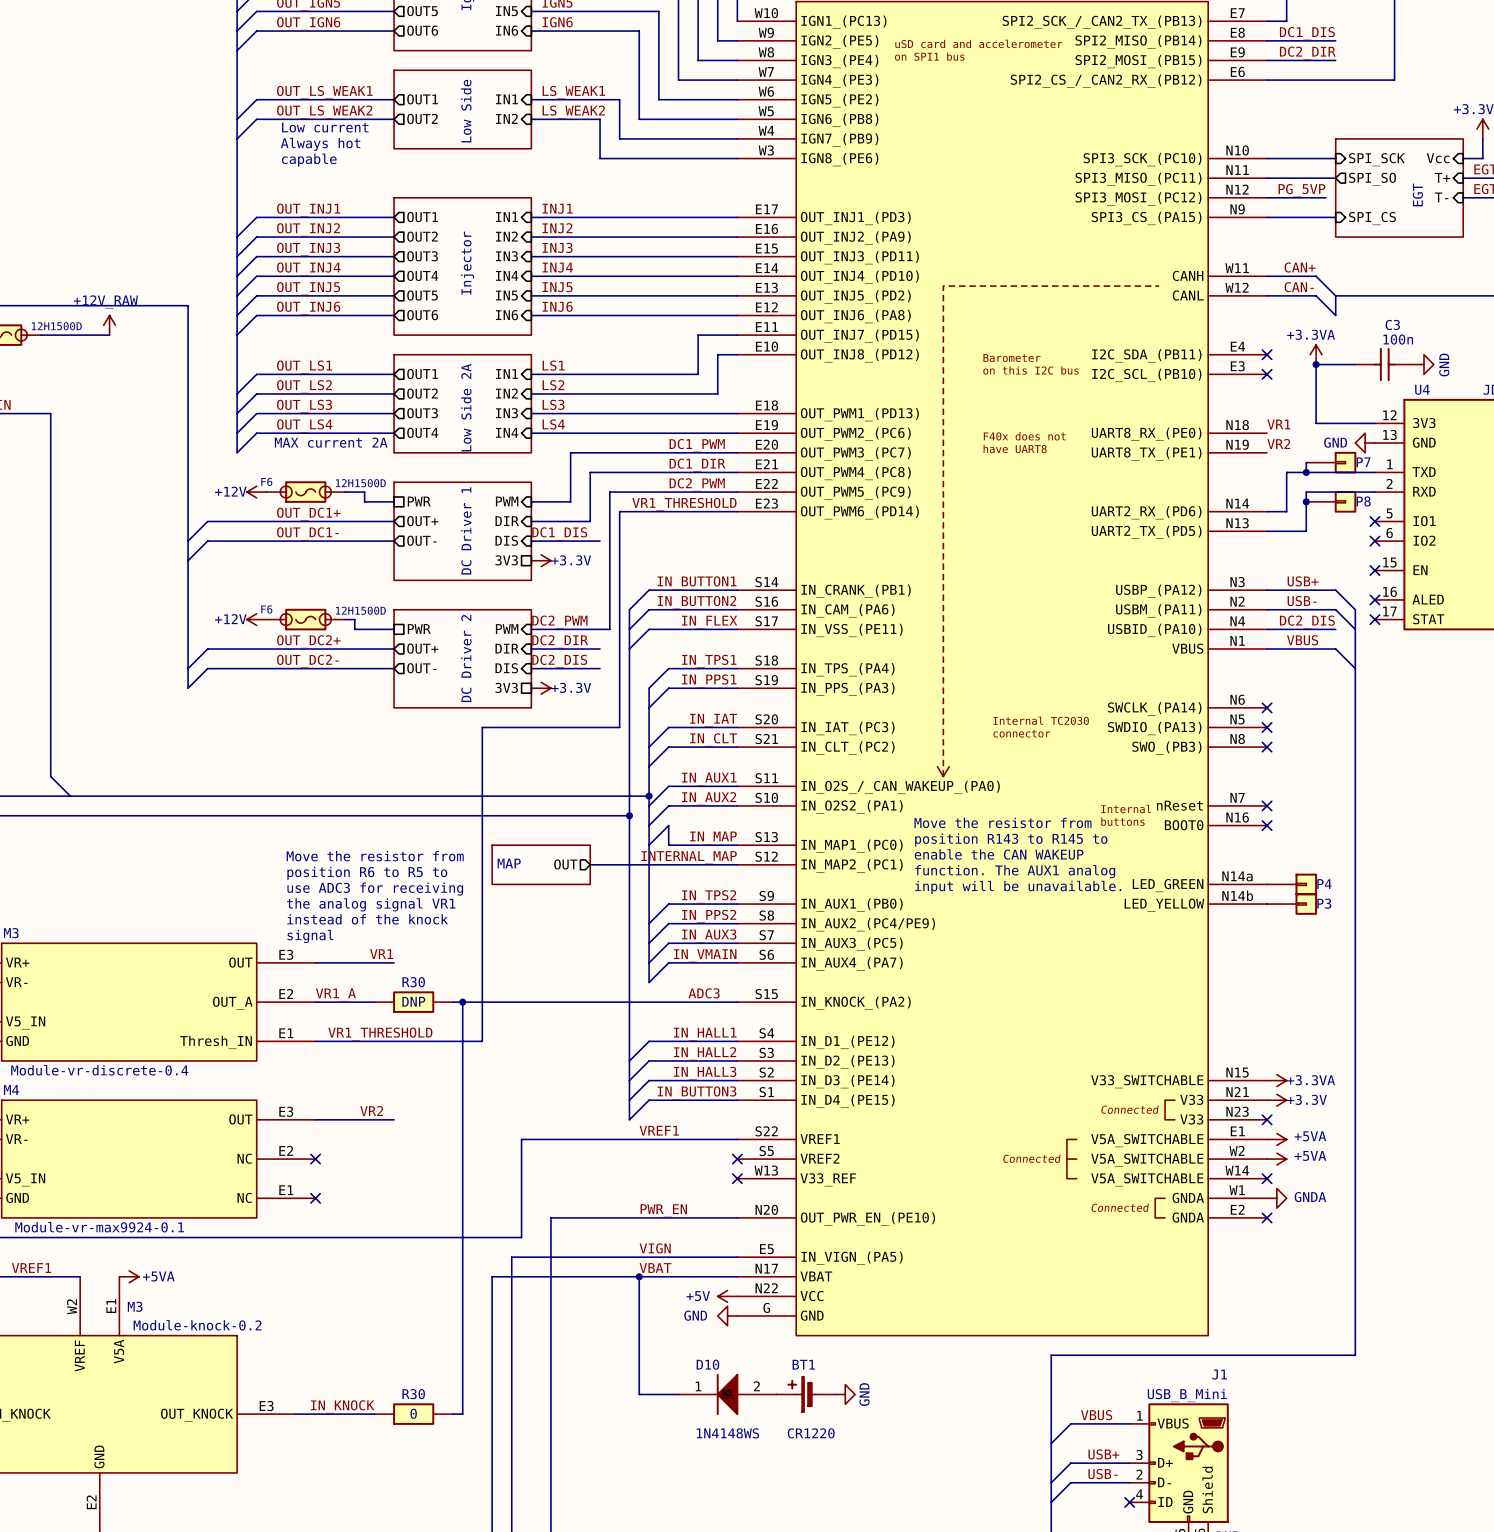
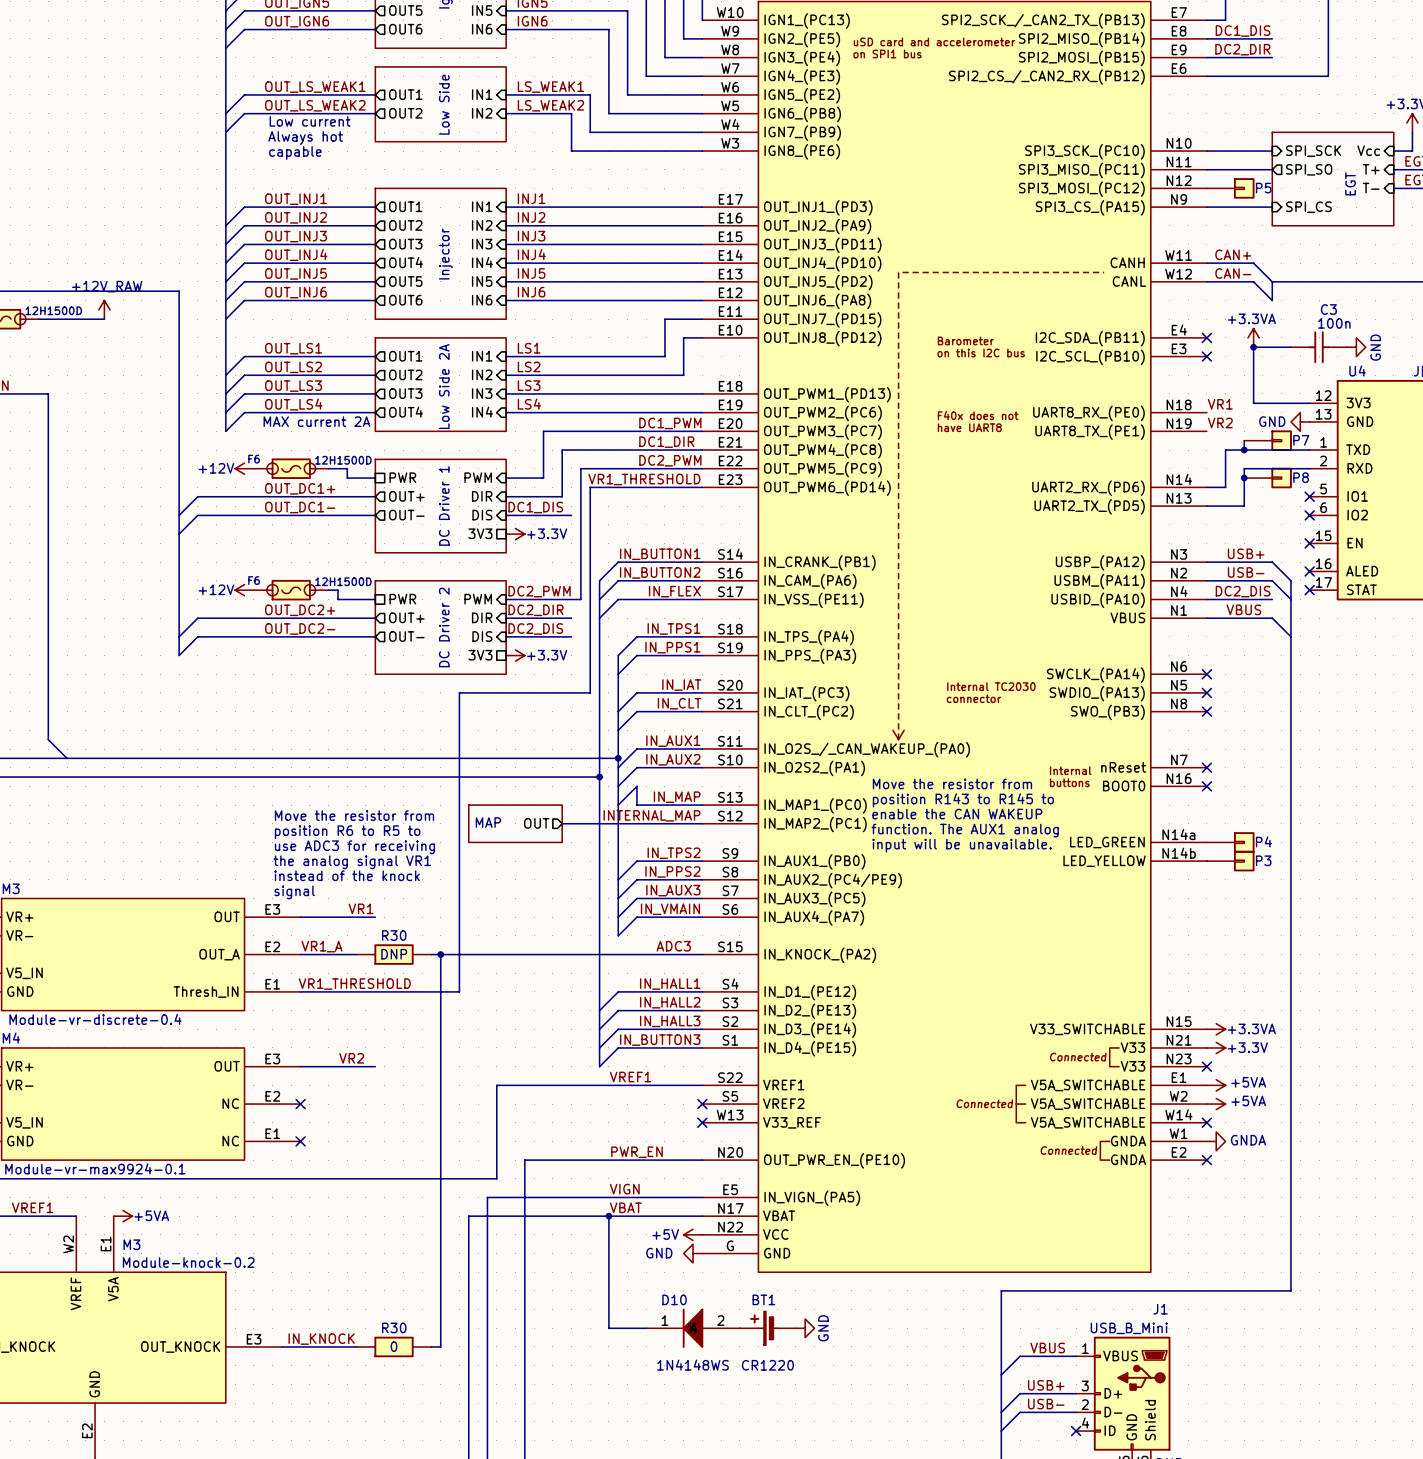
label: PG_5VP (1301, 190) -> none
P5: none -> (1230, 188)

